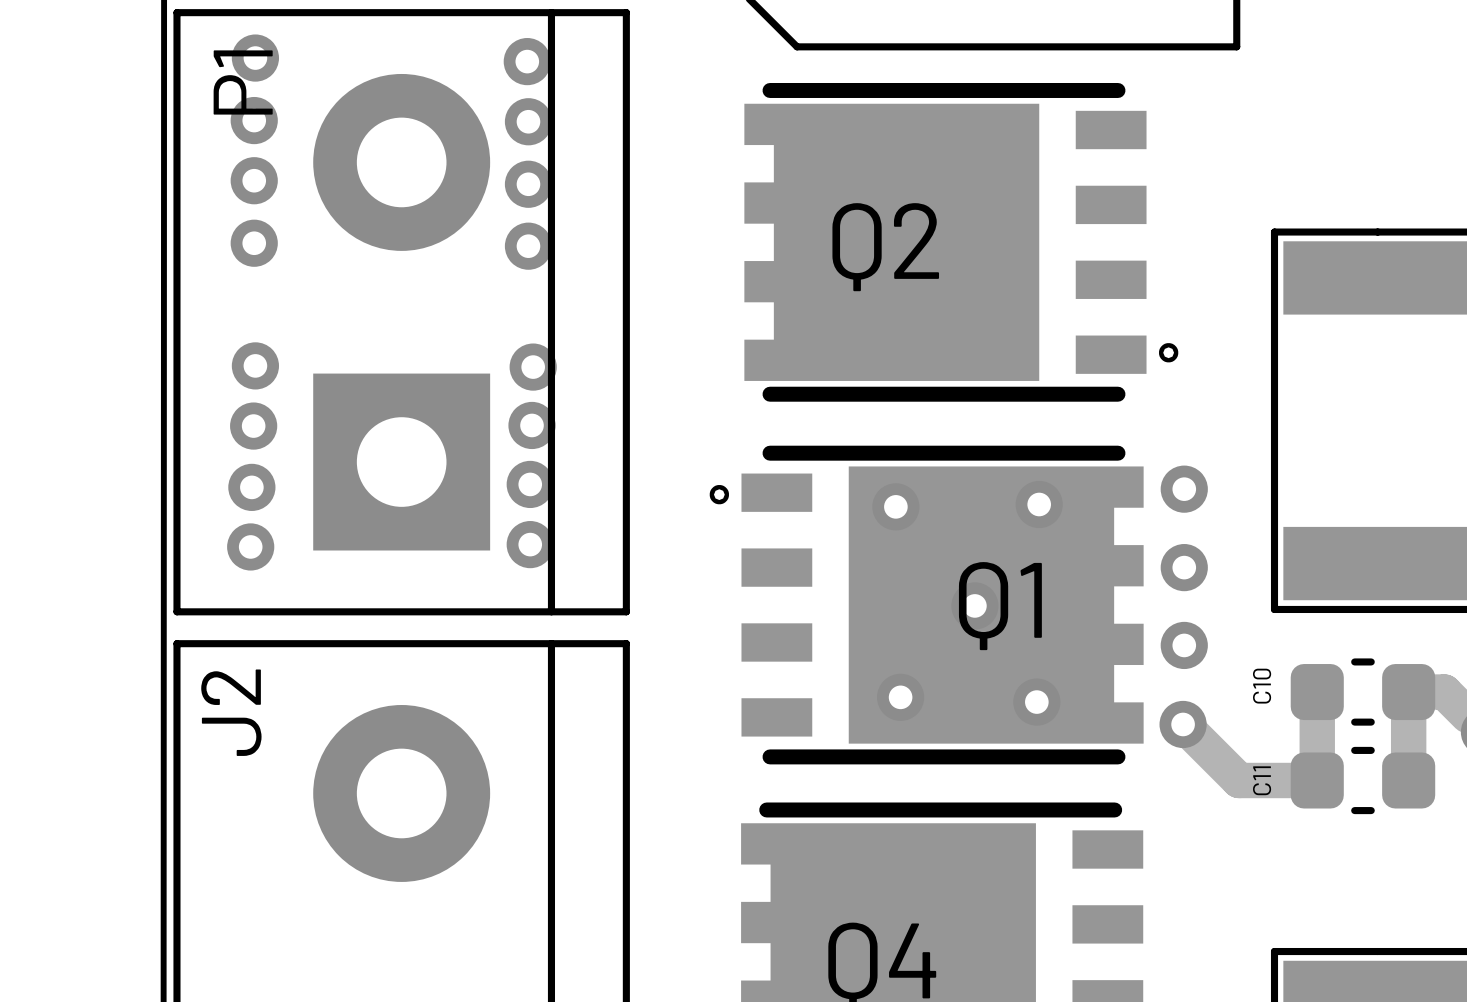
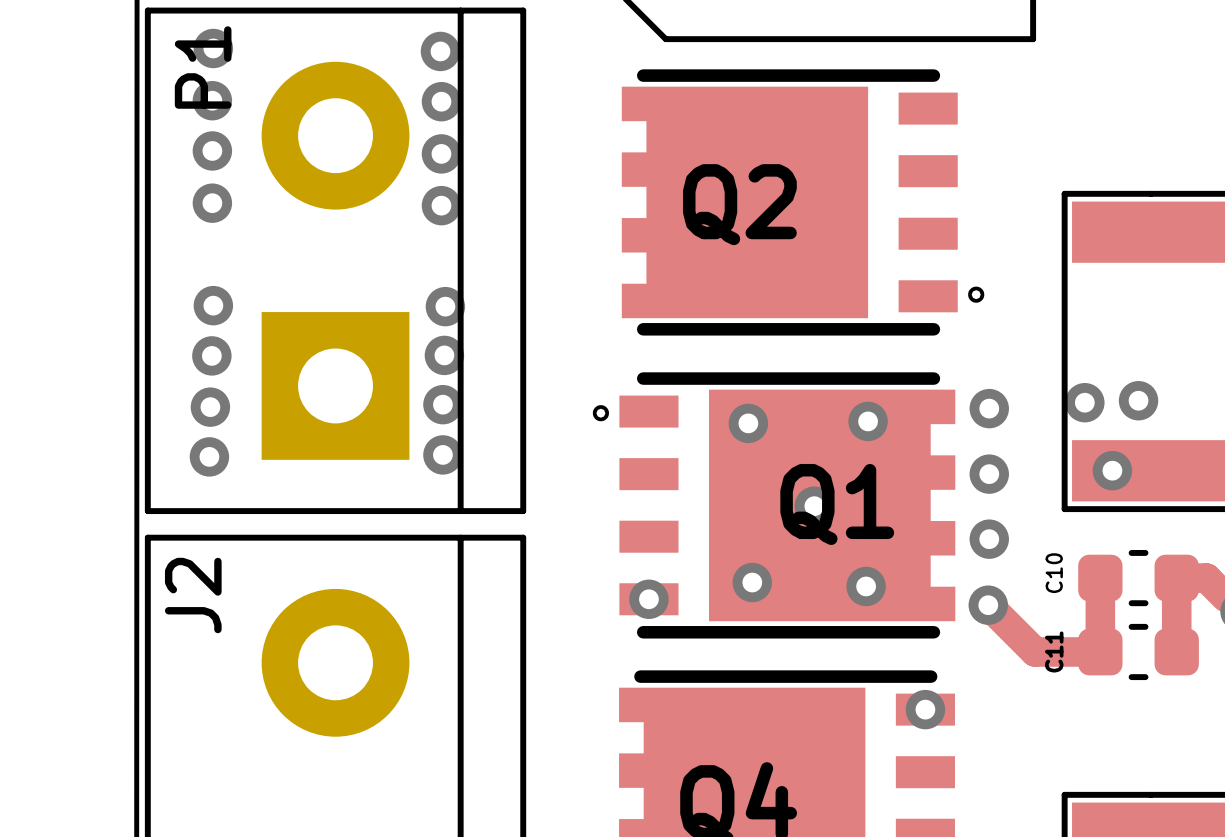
via: none -> (1138, 400)
via: none -> (1084, 402)
via: none -> (1112, 470)
via: none -> (648, 599)
via: none -> (925, 709)

